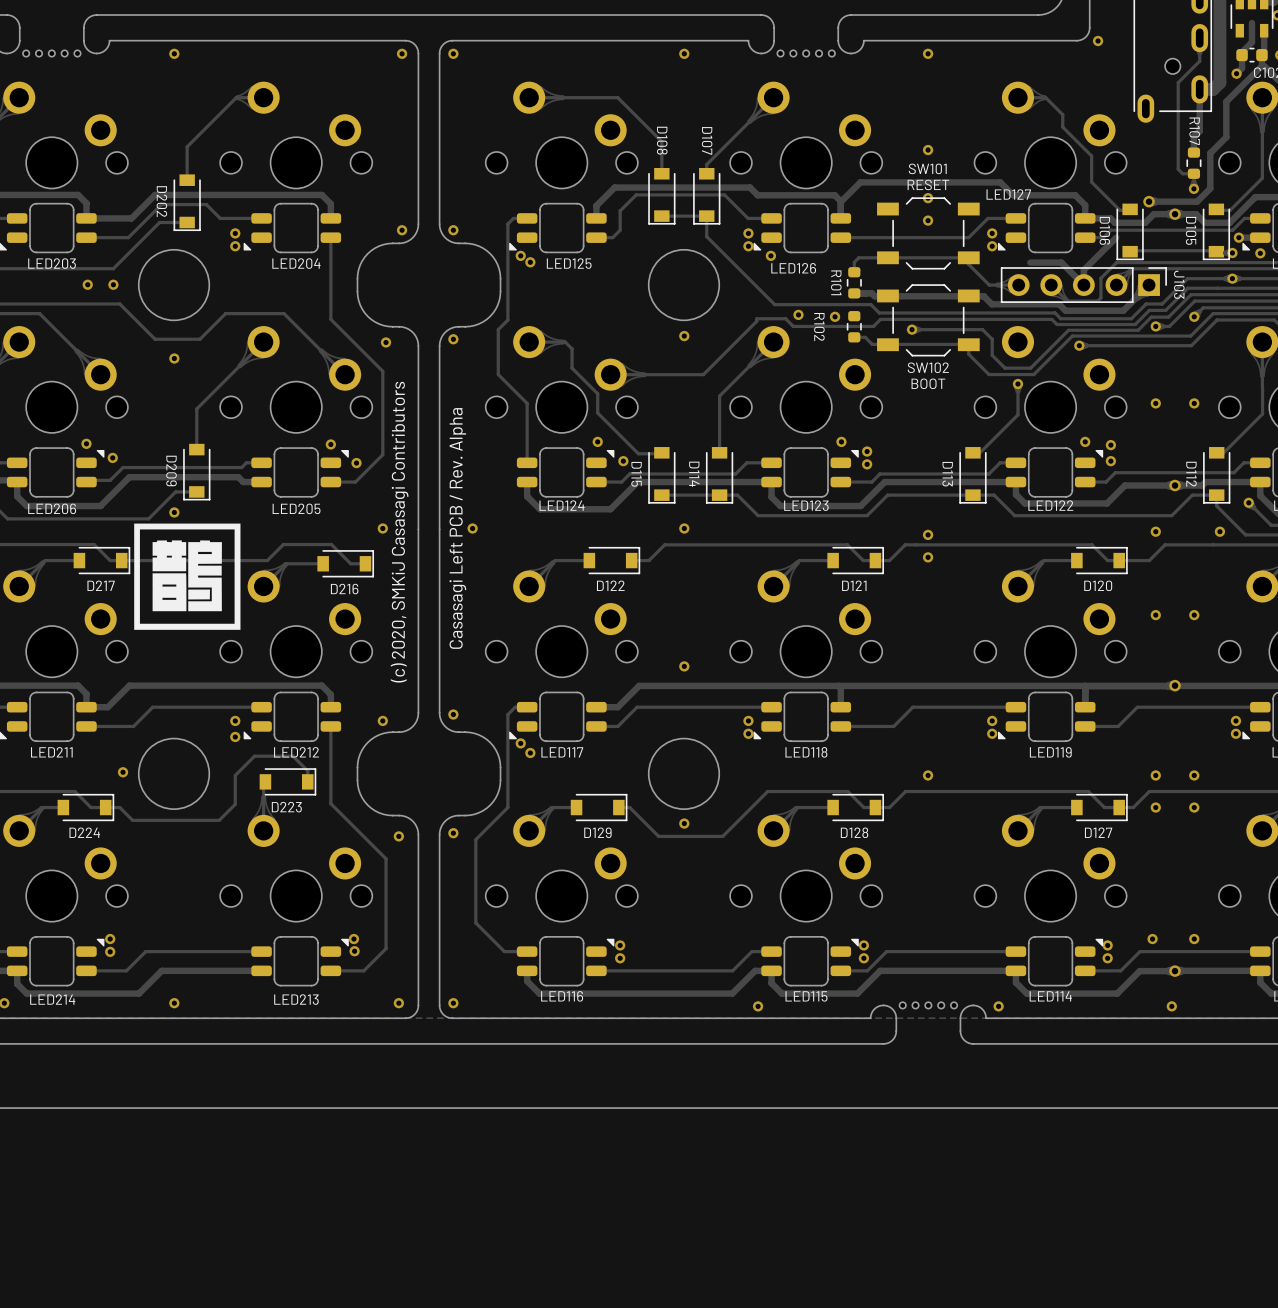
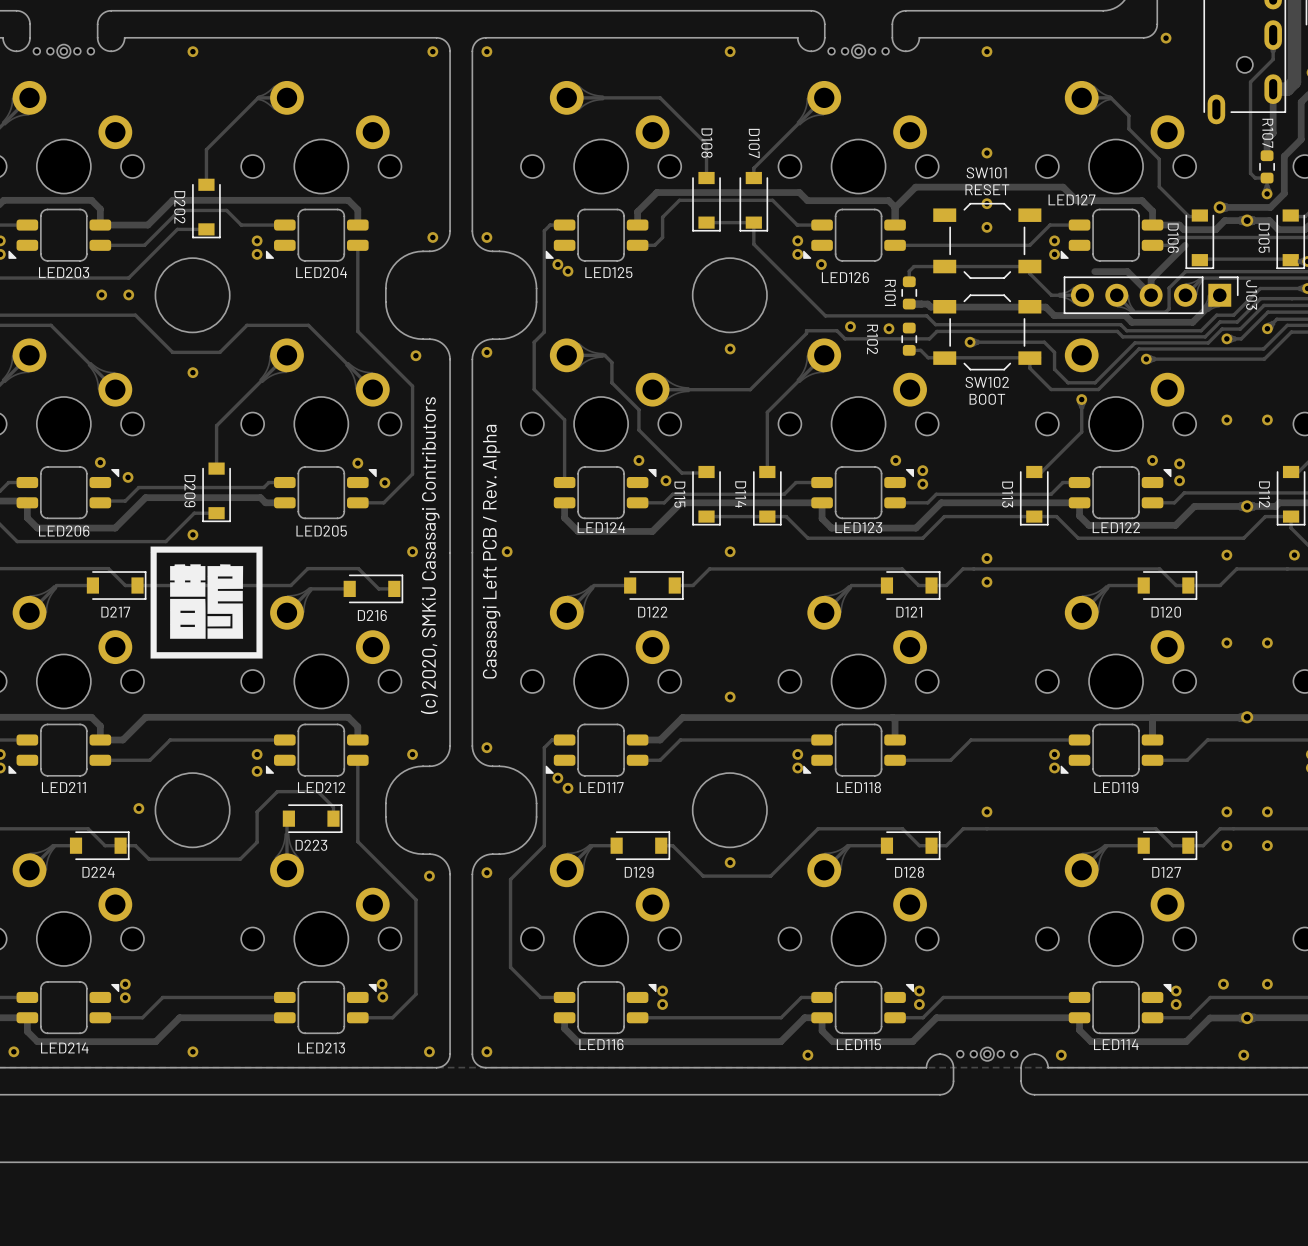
round board edge: none -> [56, 43, 72, 59]
round board edge: none -> [851, 43, 867, 59]
round board edge: none -> [979, 1046, 995, 1062]

